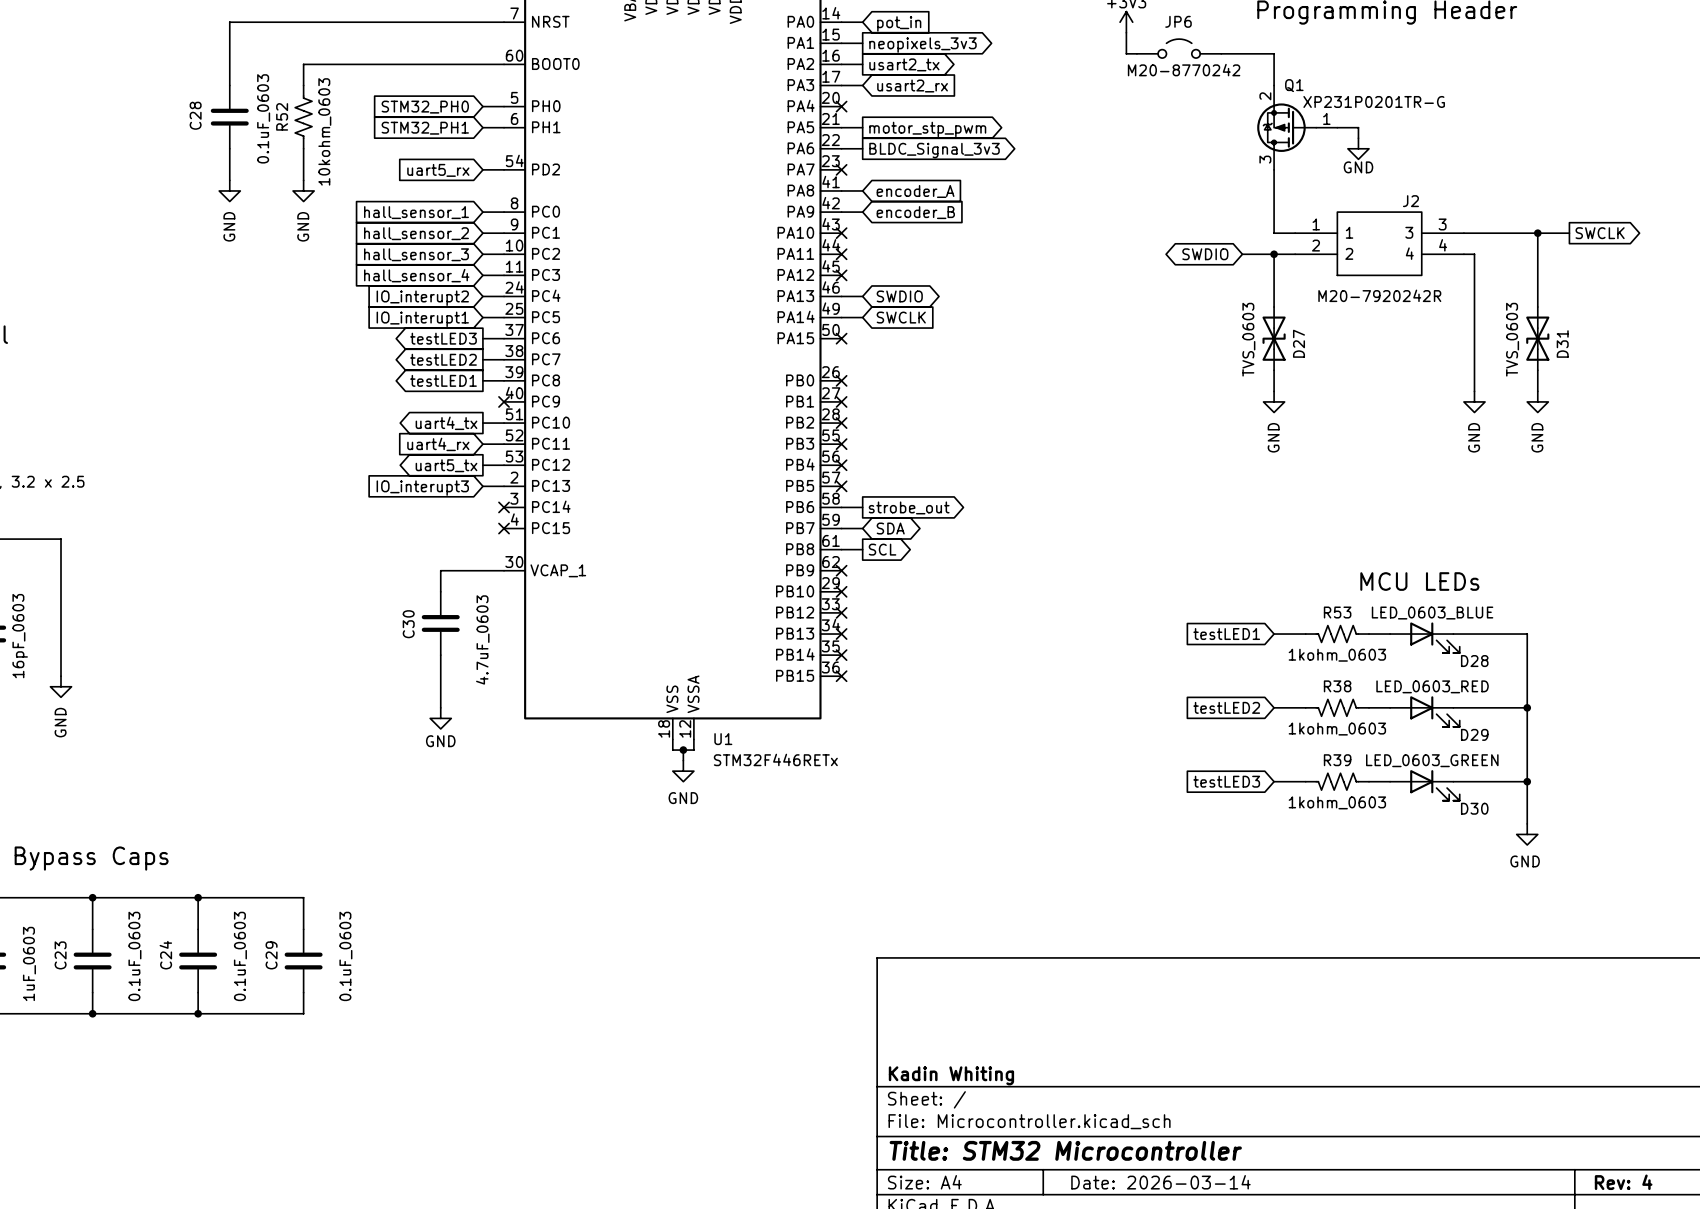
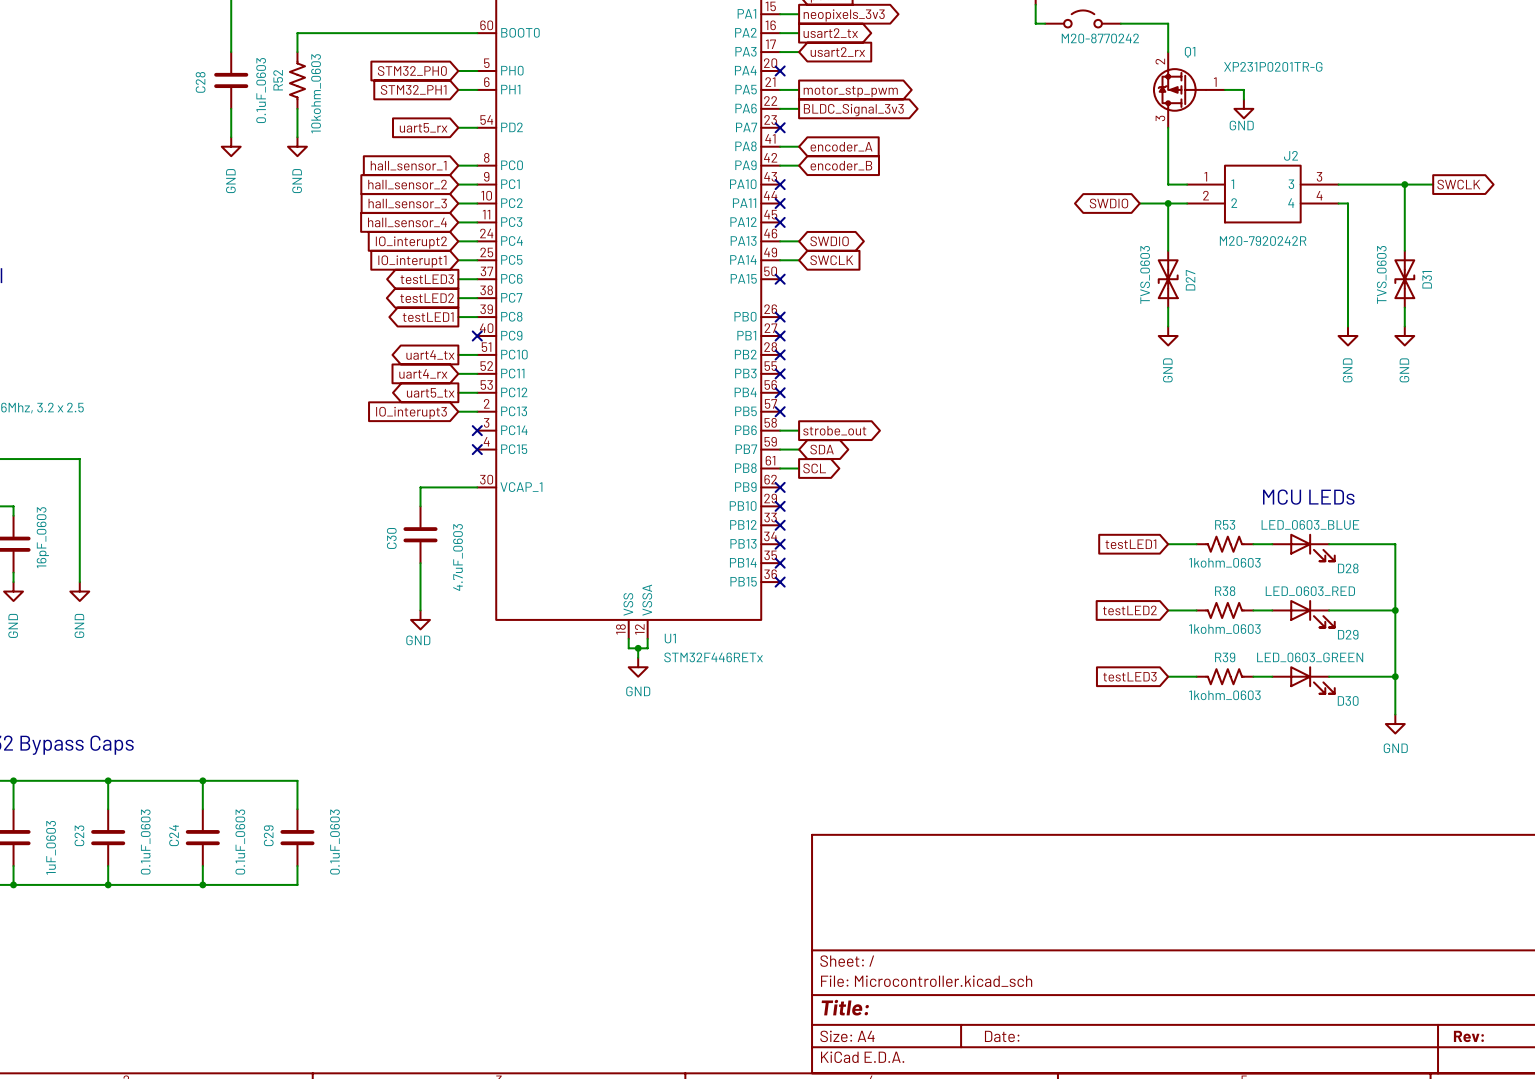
title block: Kadin Whiting (951, 1075) -> none
title block: Title: STM32 Microcontroller (1065, 1150) -> Title: (845, 1007)
title block: Date: 2026-03-14 (1160, 1182) -> Date: (1002, 1036)
title block: Rev: 4 (1623, 1182) -> Rev: (1468, 1036)

